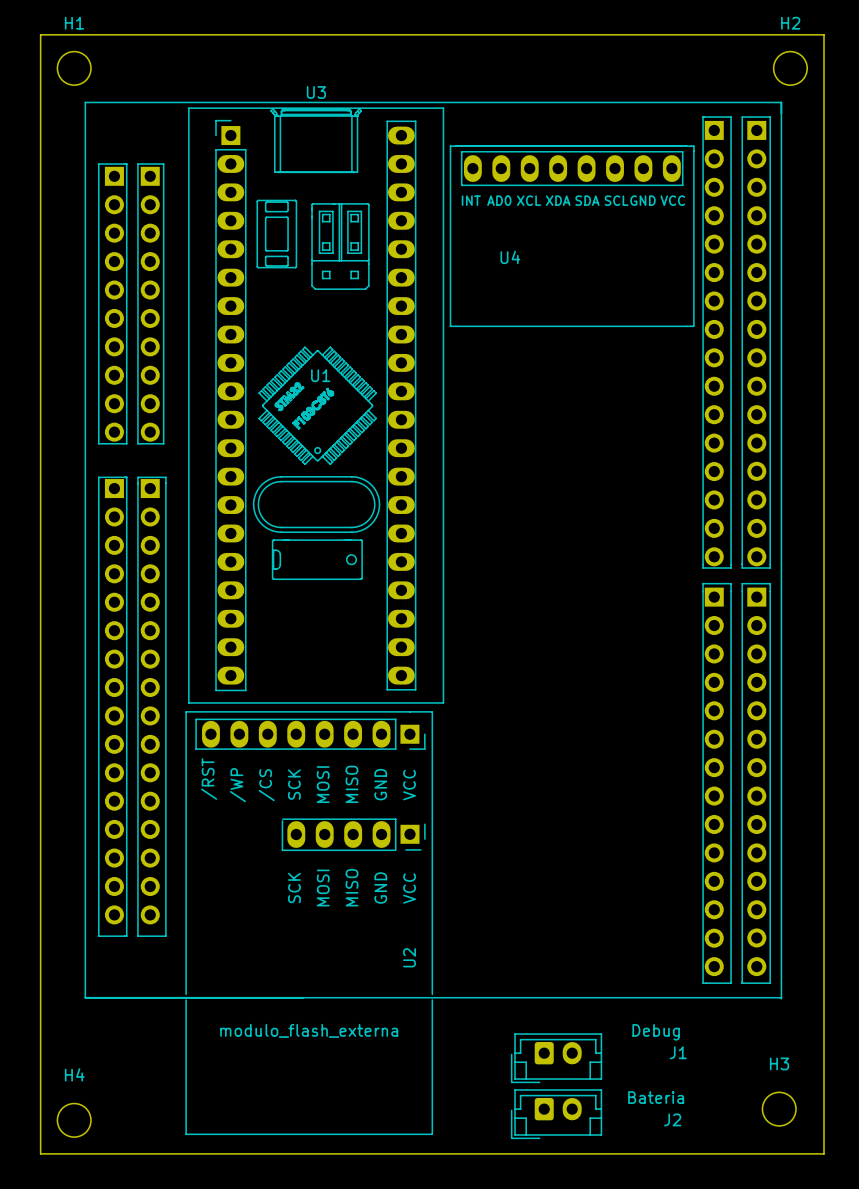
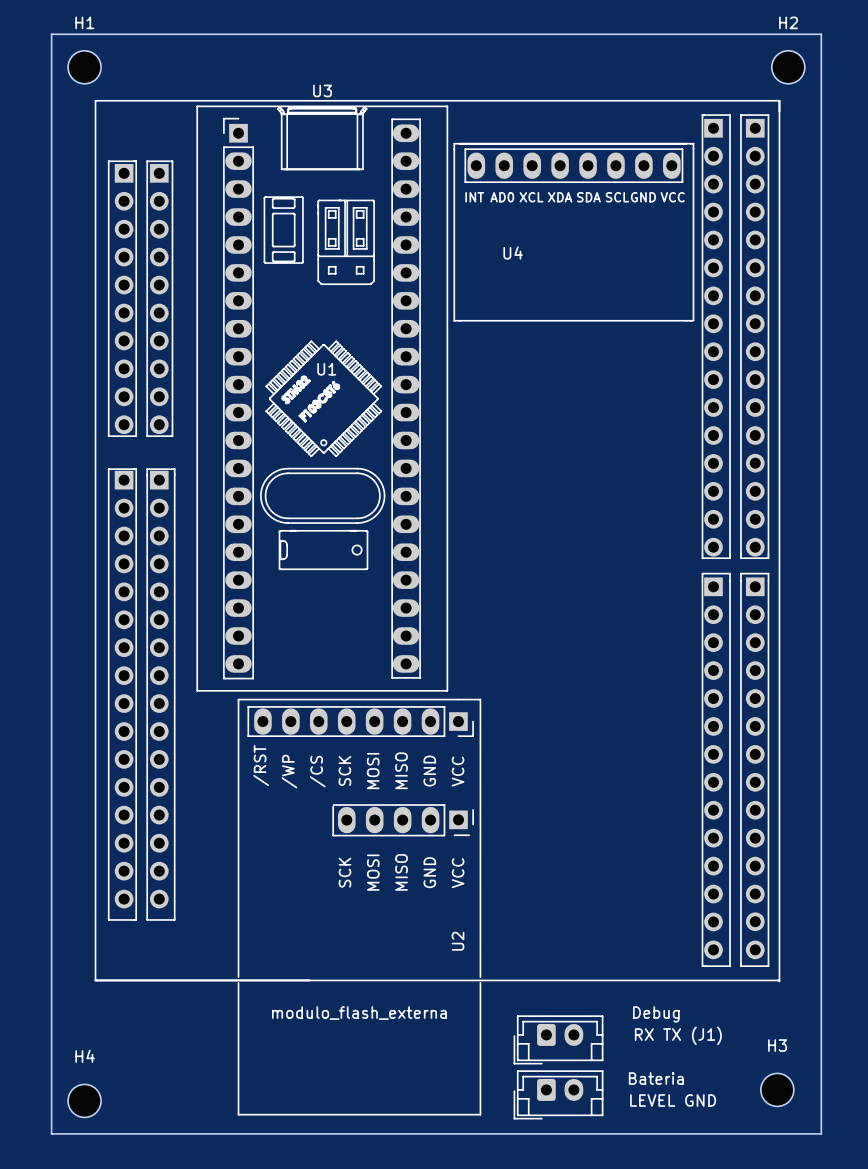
U2 position: (309, 923) -> (359, 907)
J1 name: J1 (678, 1052) -> RX TX (J1) (678, 1035)
J2 name: J2 (672, 1119) -> LEVEL GND (673, 1100)

